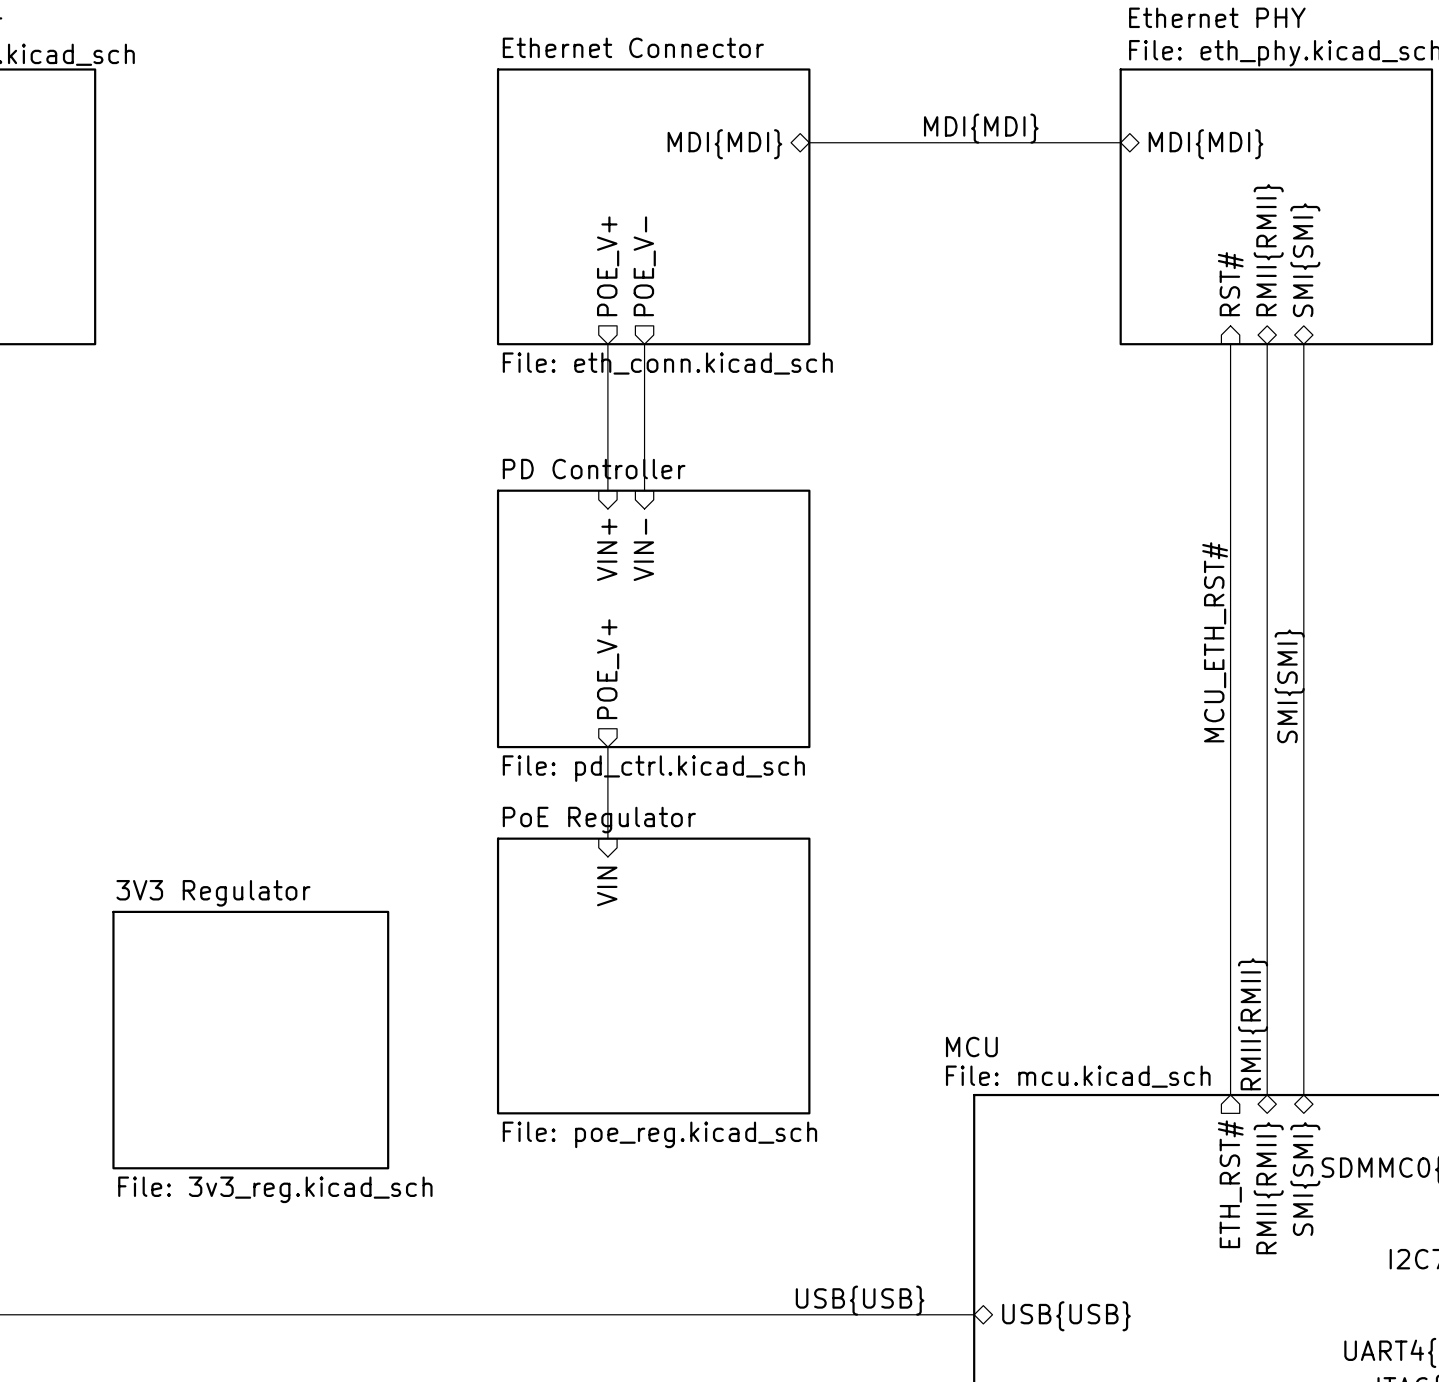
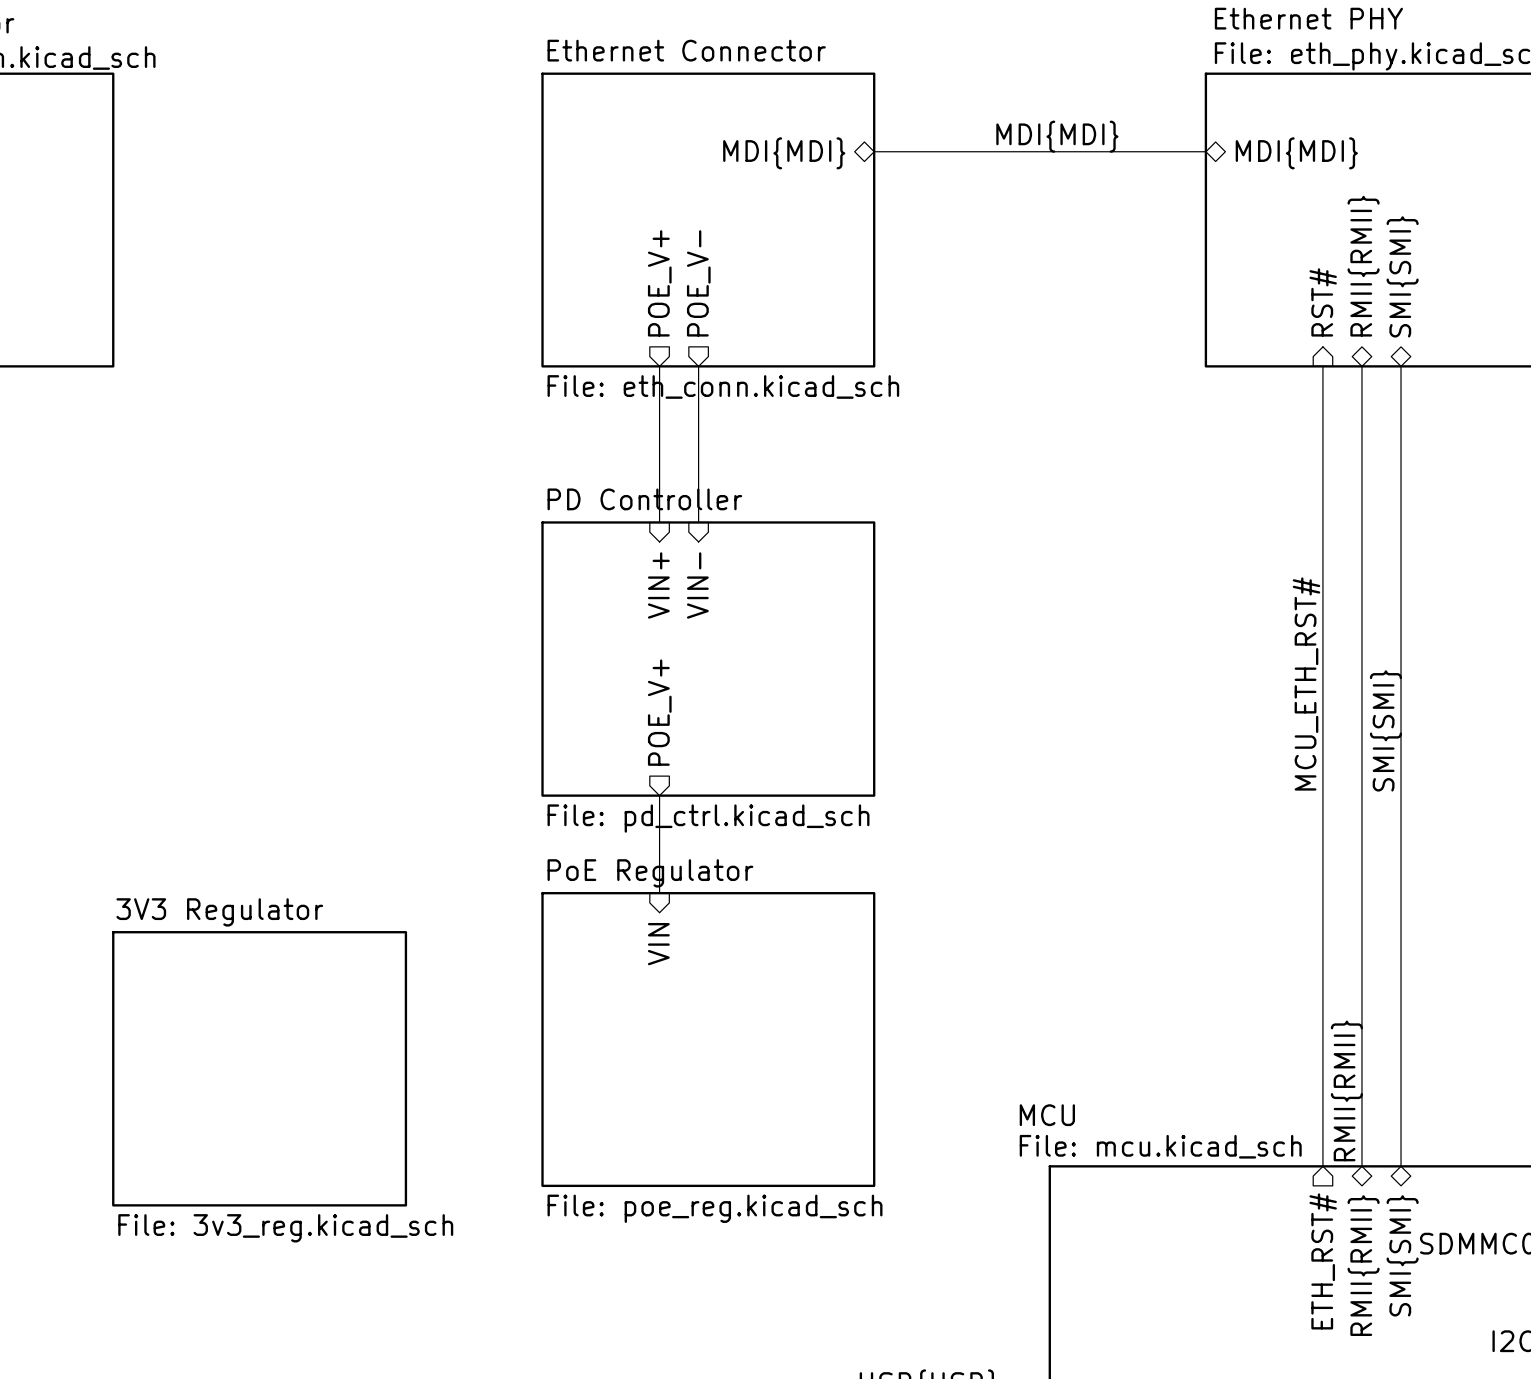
sheet 3V3 Regulator position: (250, 1040) -> (259, 1068)

